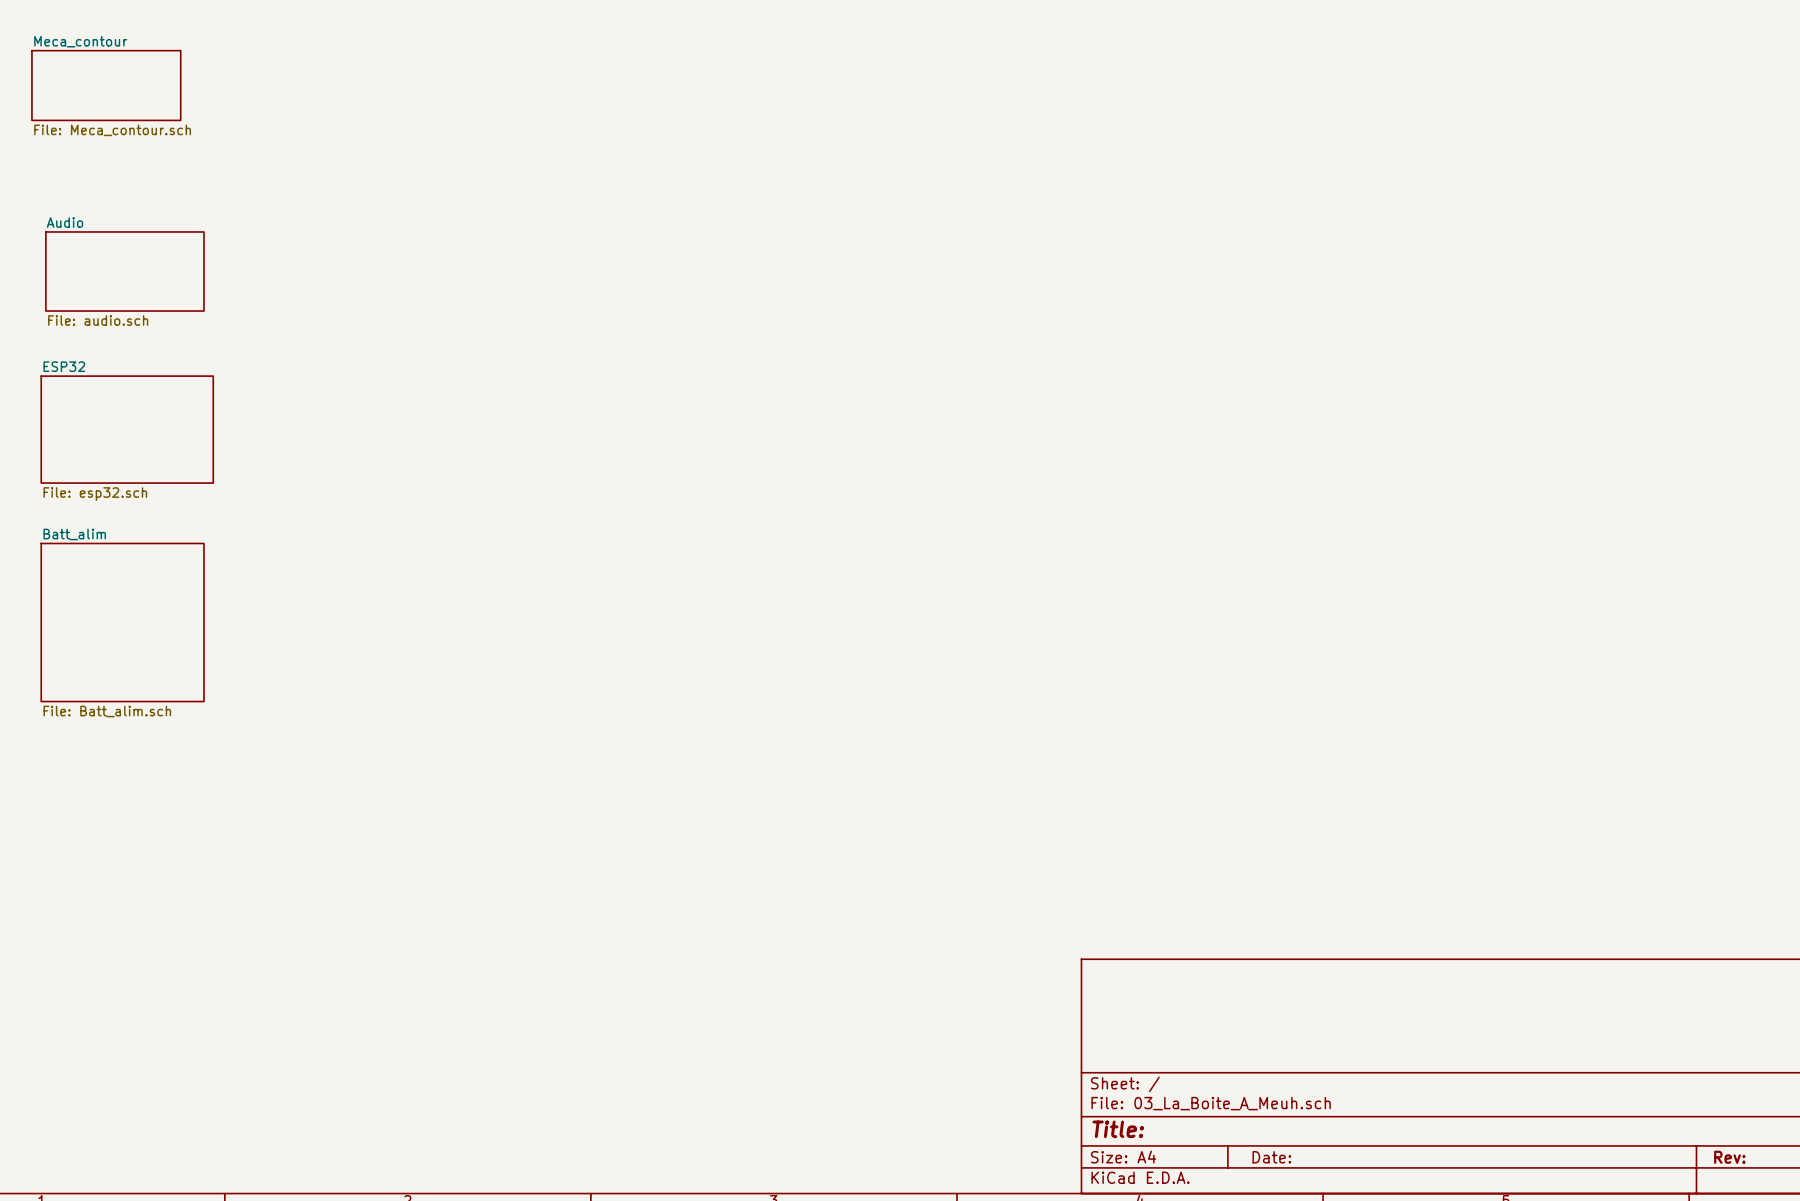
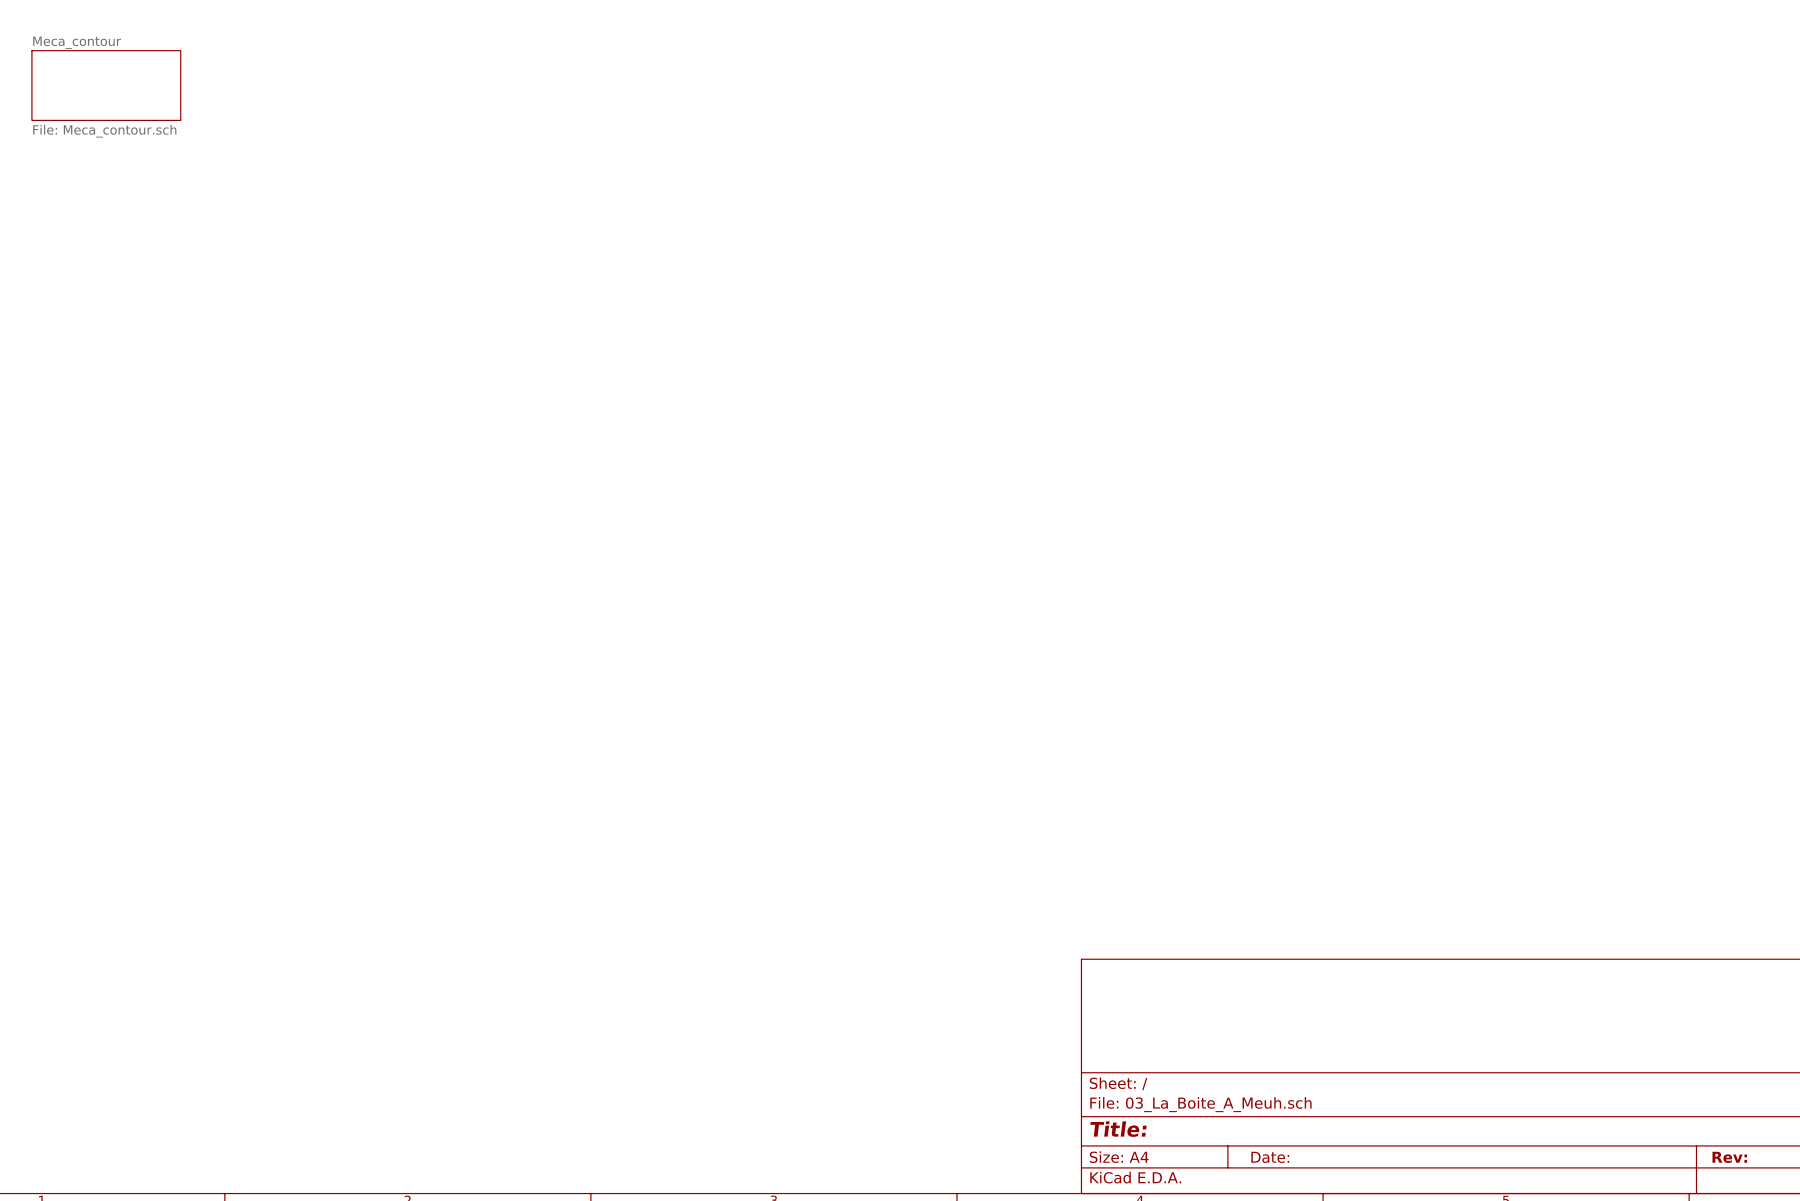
sheet Audio: File: audio.sch (124, 271) -> none
sheet ESP32: File: esp32.sch (127, 429) -> none
sheet Batt_alim: File: Batt_alim.sch (122, 622) -> none

